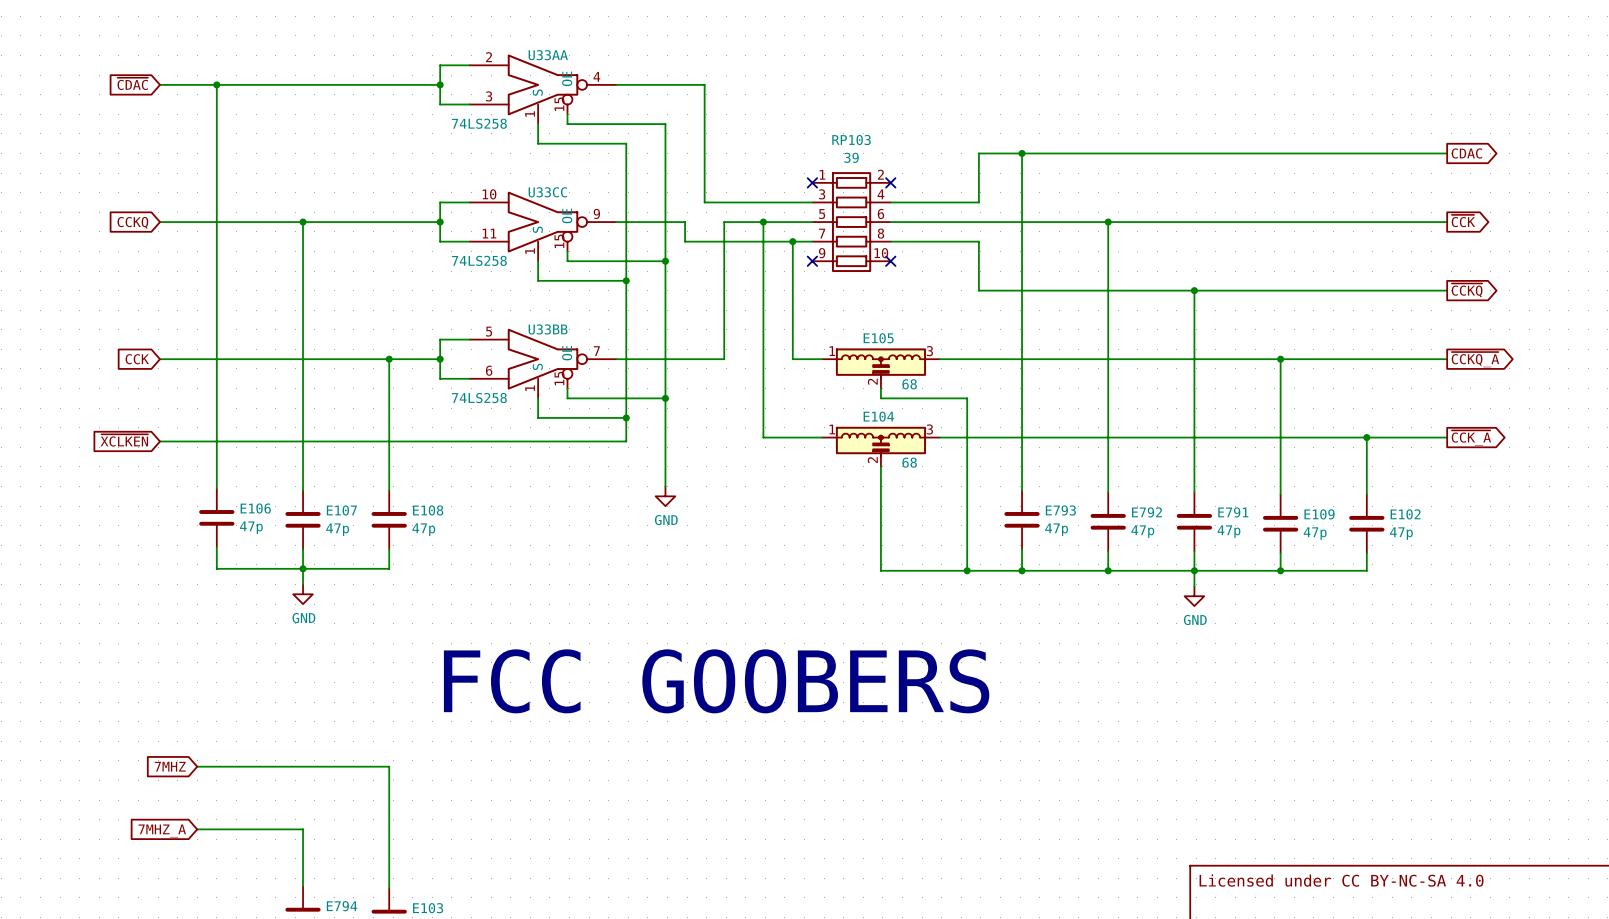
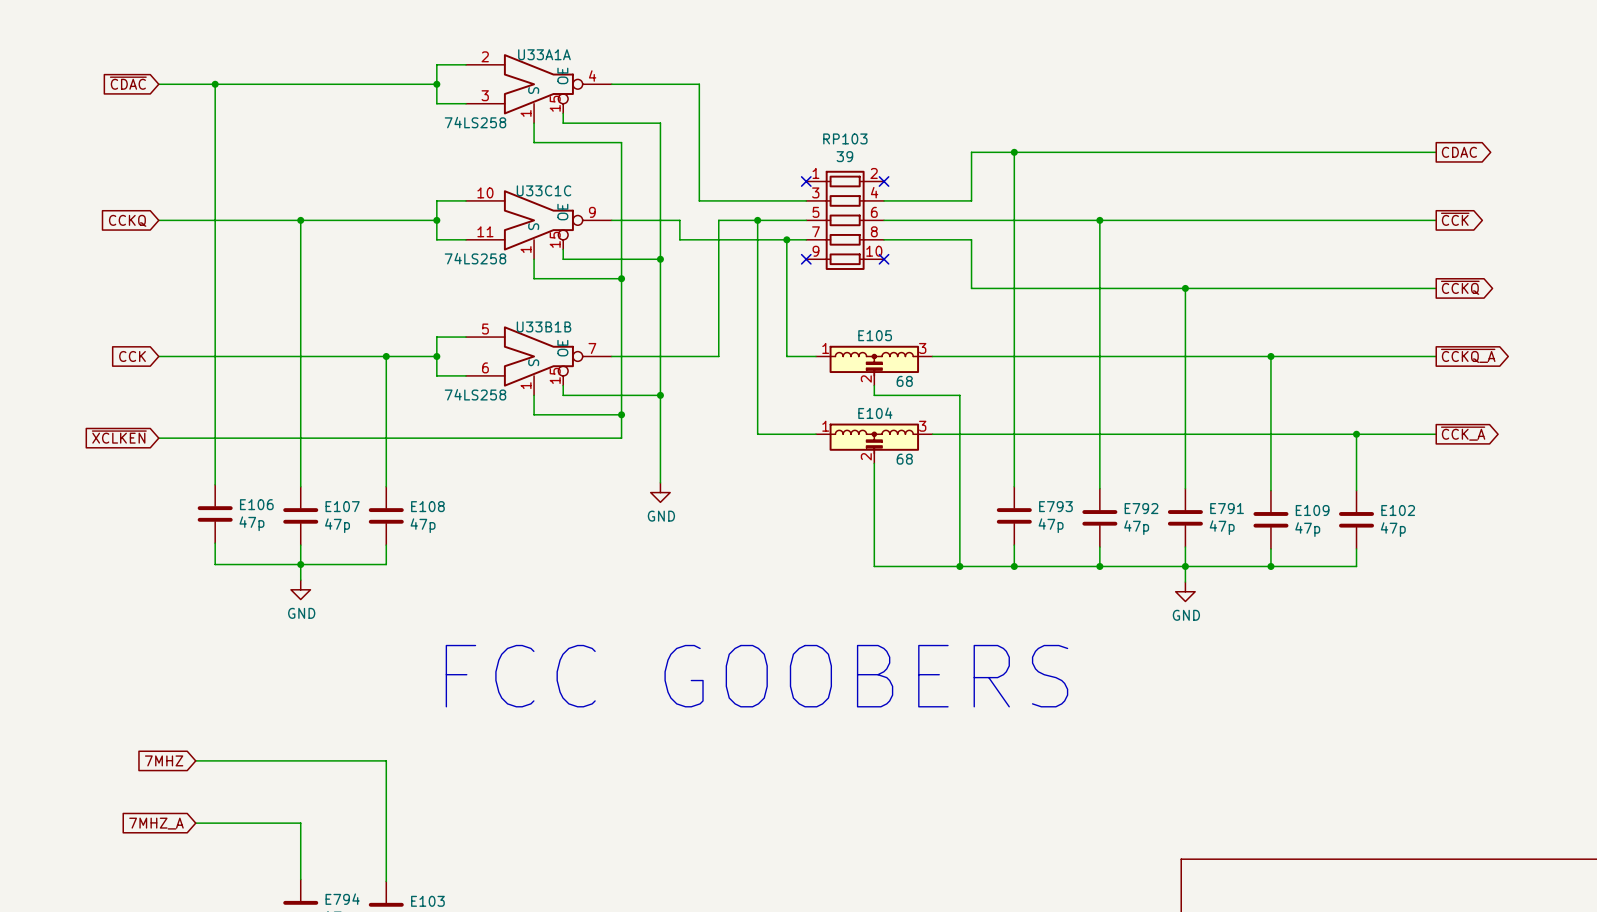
U33AA name: U33AA (548, 55) -> U33A1A (544, 54)
U33CC name: U33CC (547, 192) -> U33C1C (544, 190)
U33BB name: U33BB (548, 329) -> U33B1B (544, 326)
title block: Licensed under CC BY-NC-SA 4.0 (1341, 880) -> none

